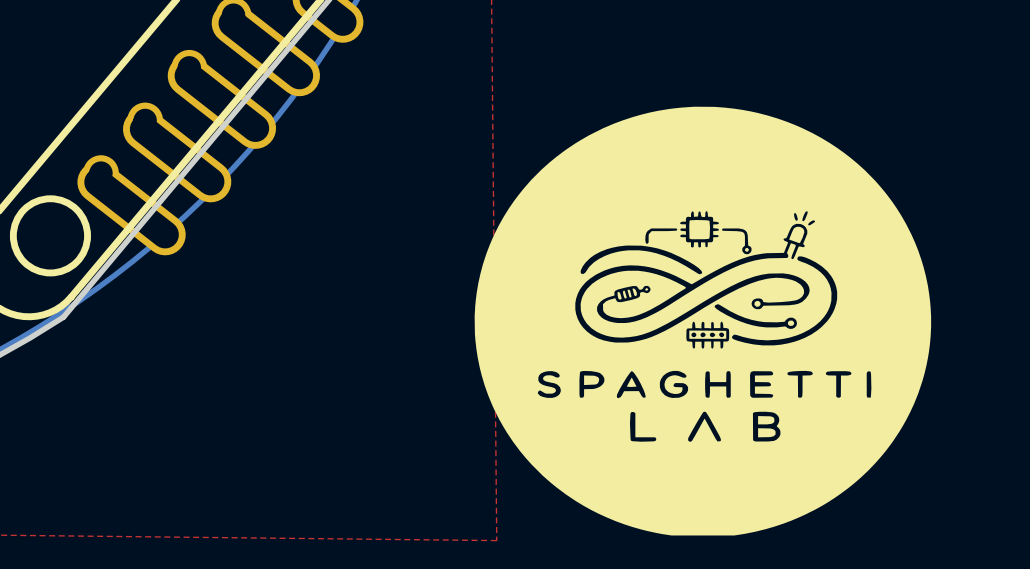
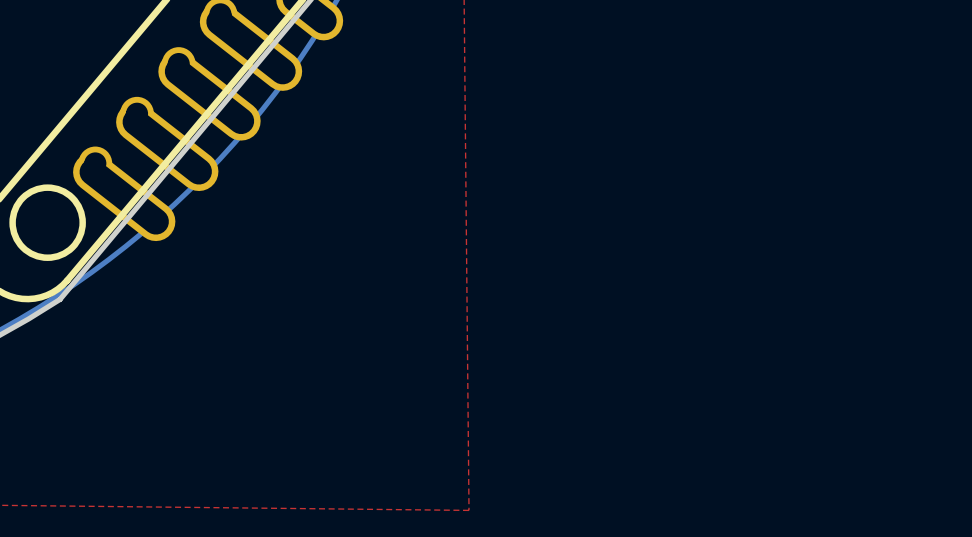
drawing: [474, 106, 932, 536] -> none

